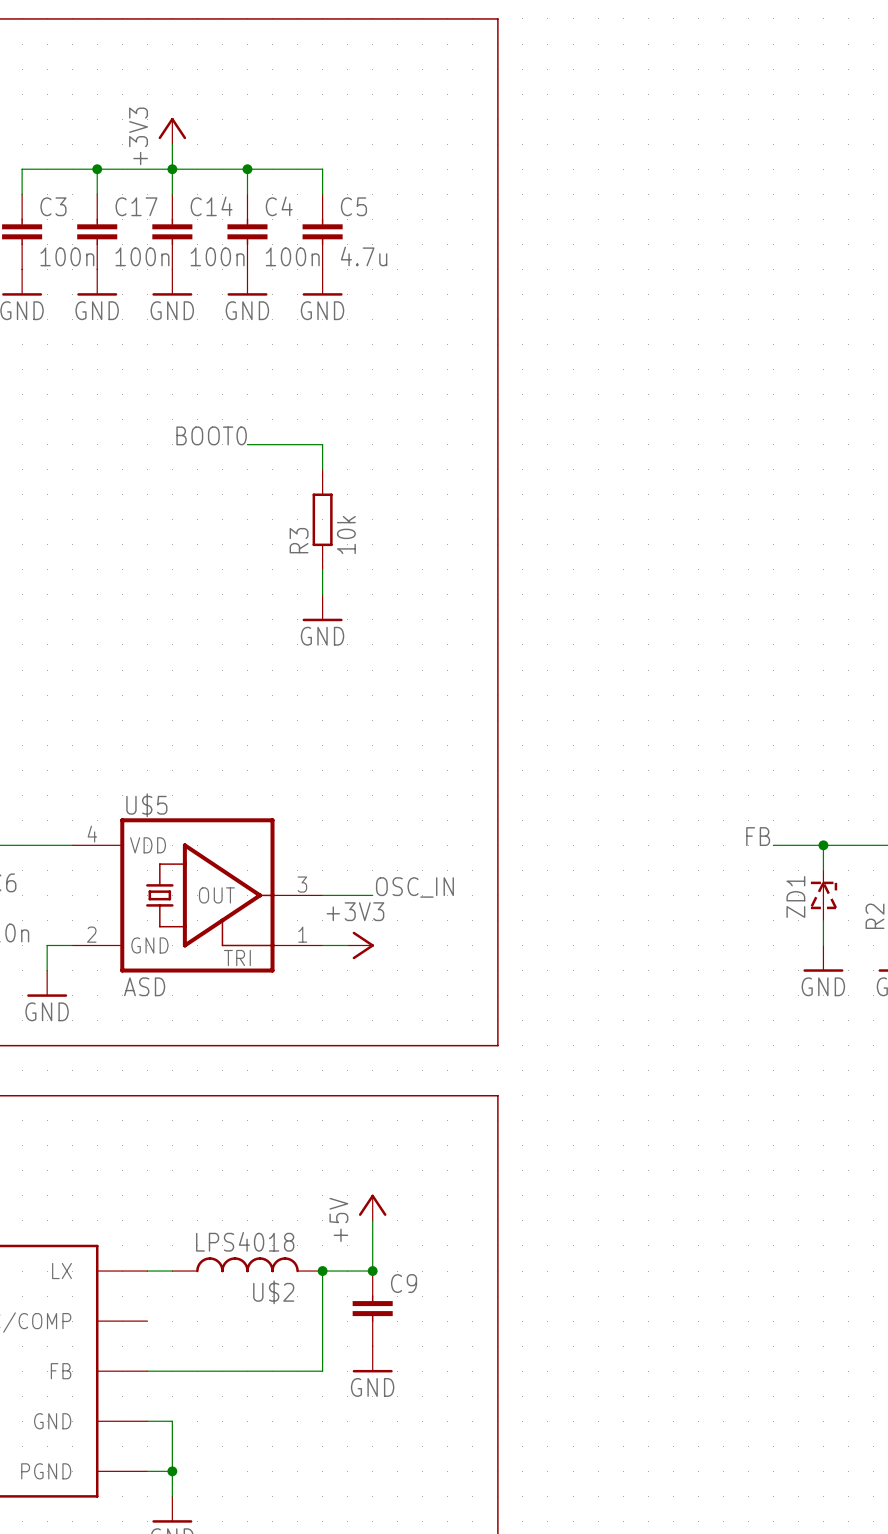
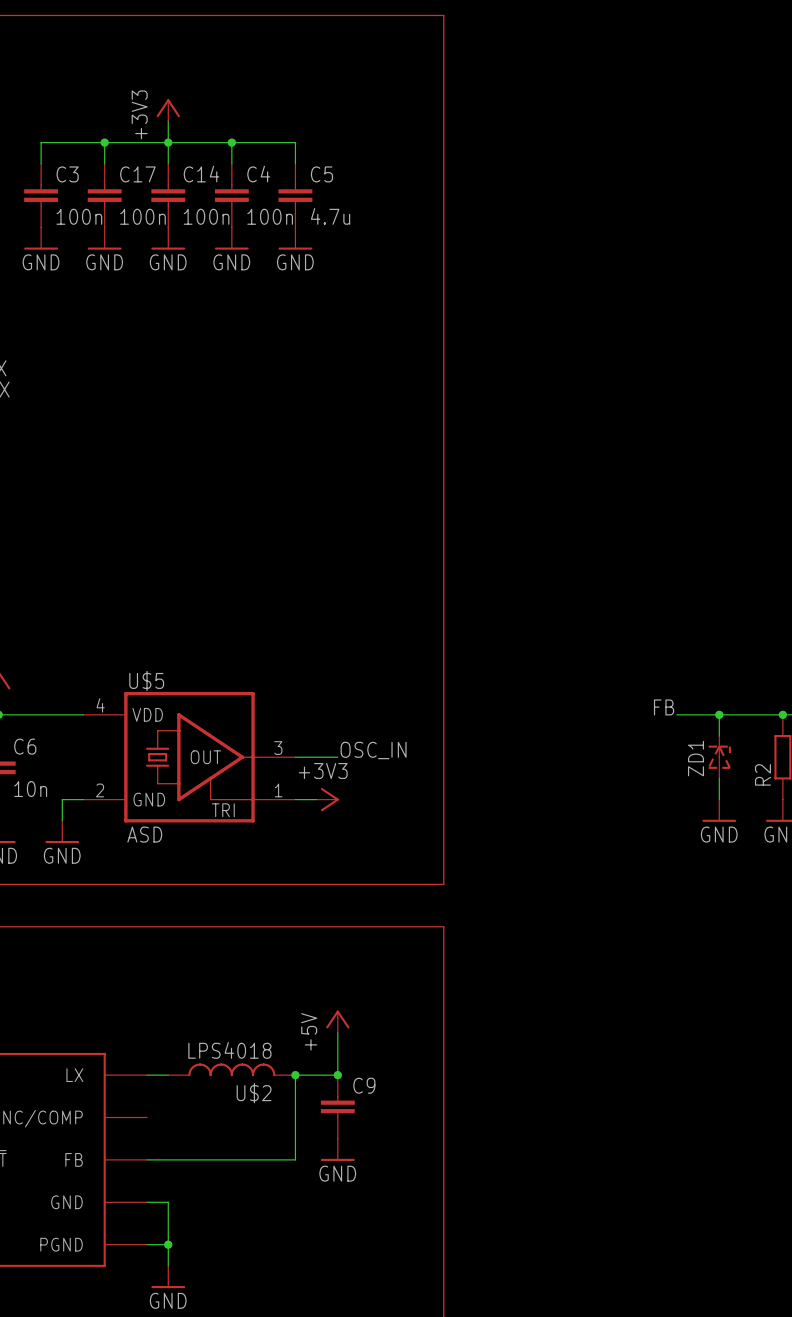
label: BOOT0 (211, 435) -> none
wire: (247, 444) (322, 444) (322, 469) -> none
R3: 10k (322, 519) -> none
wire: (322, 569) (322, 594) -> none
power symbol: GND (322, 608) -> none

